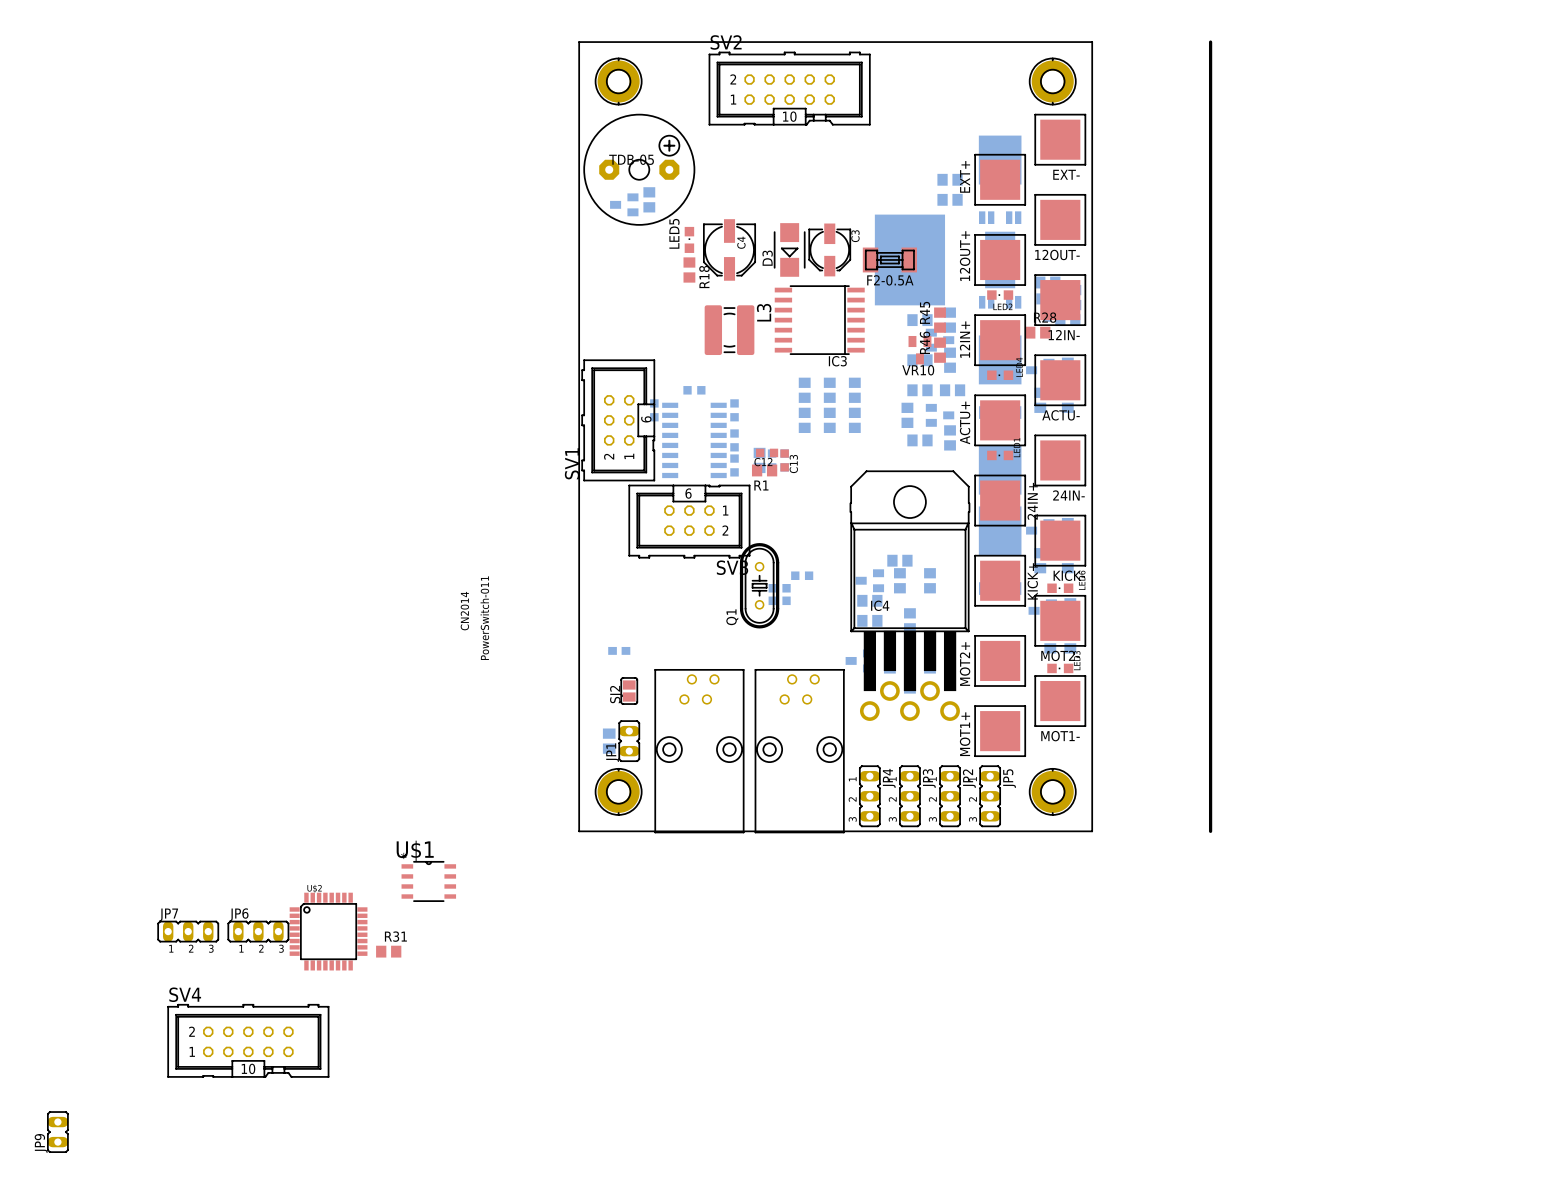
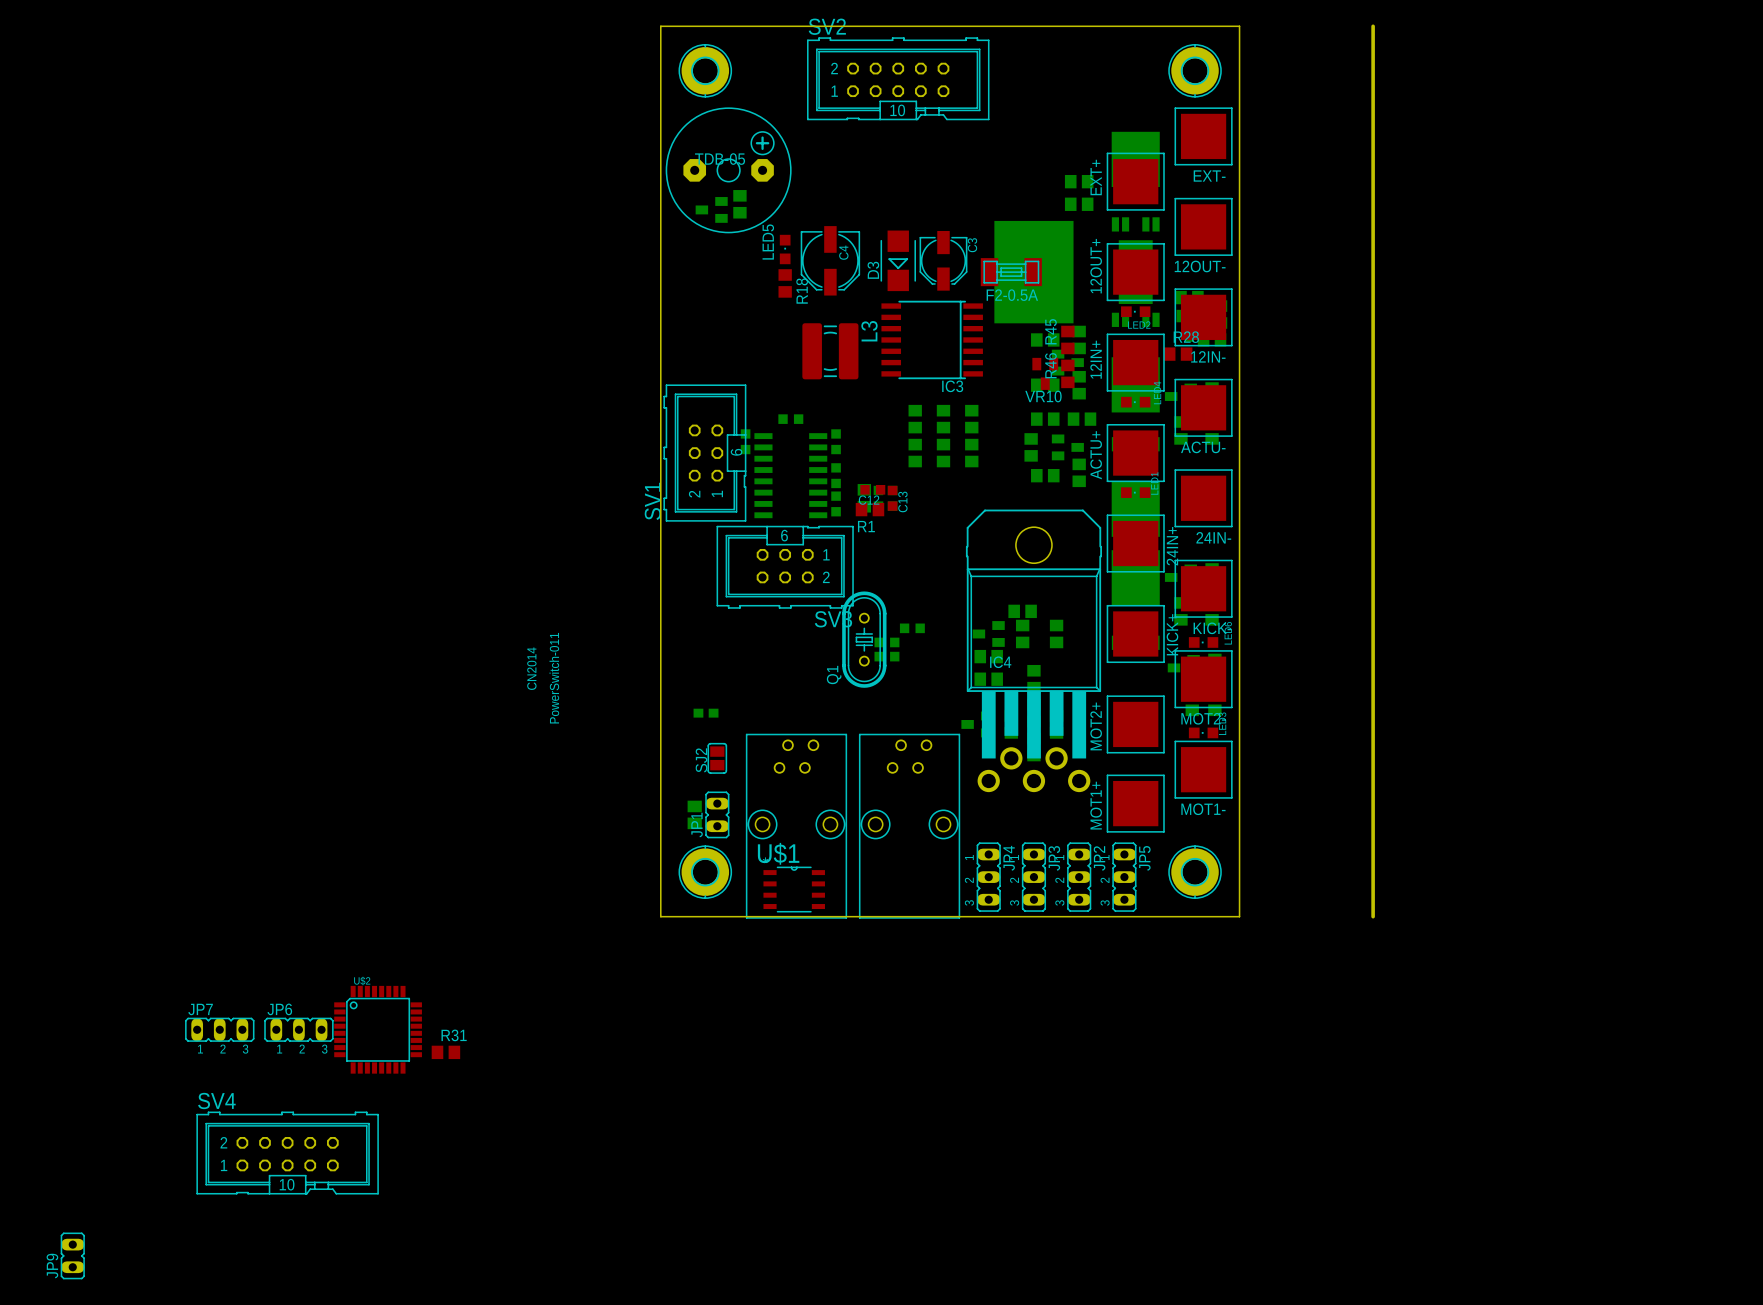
U$1 position: (428, 881) -> (794, 889)

